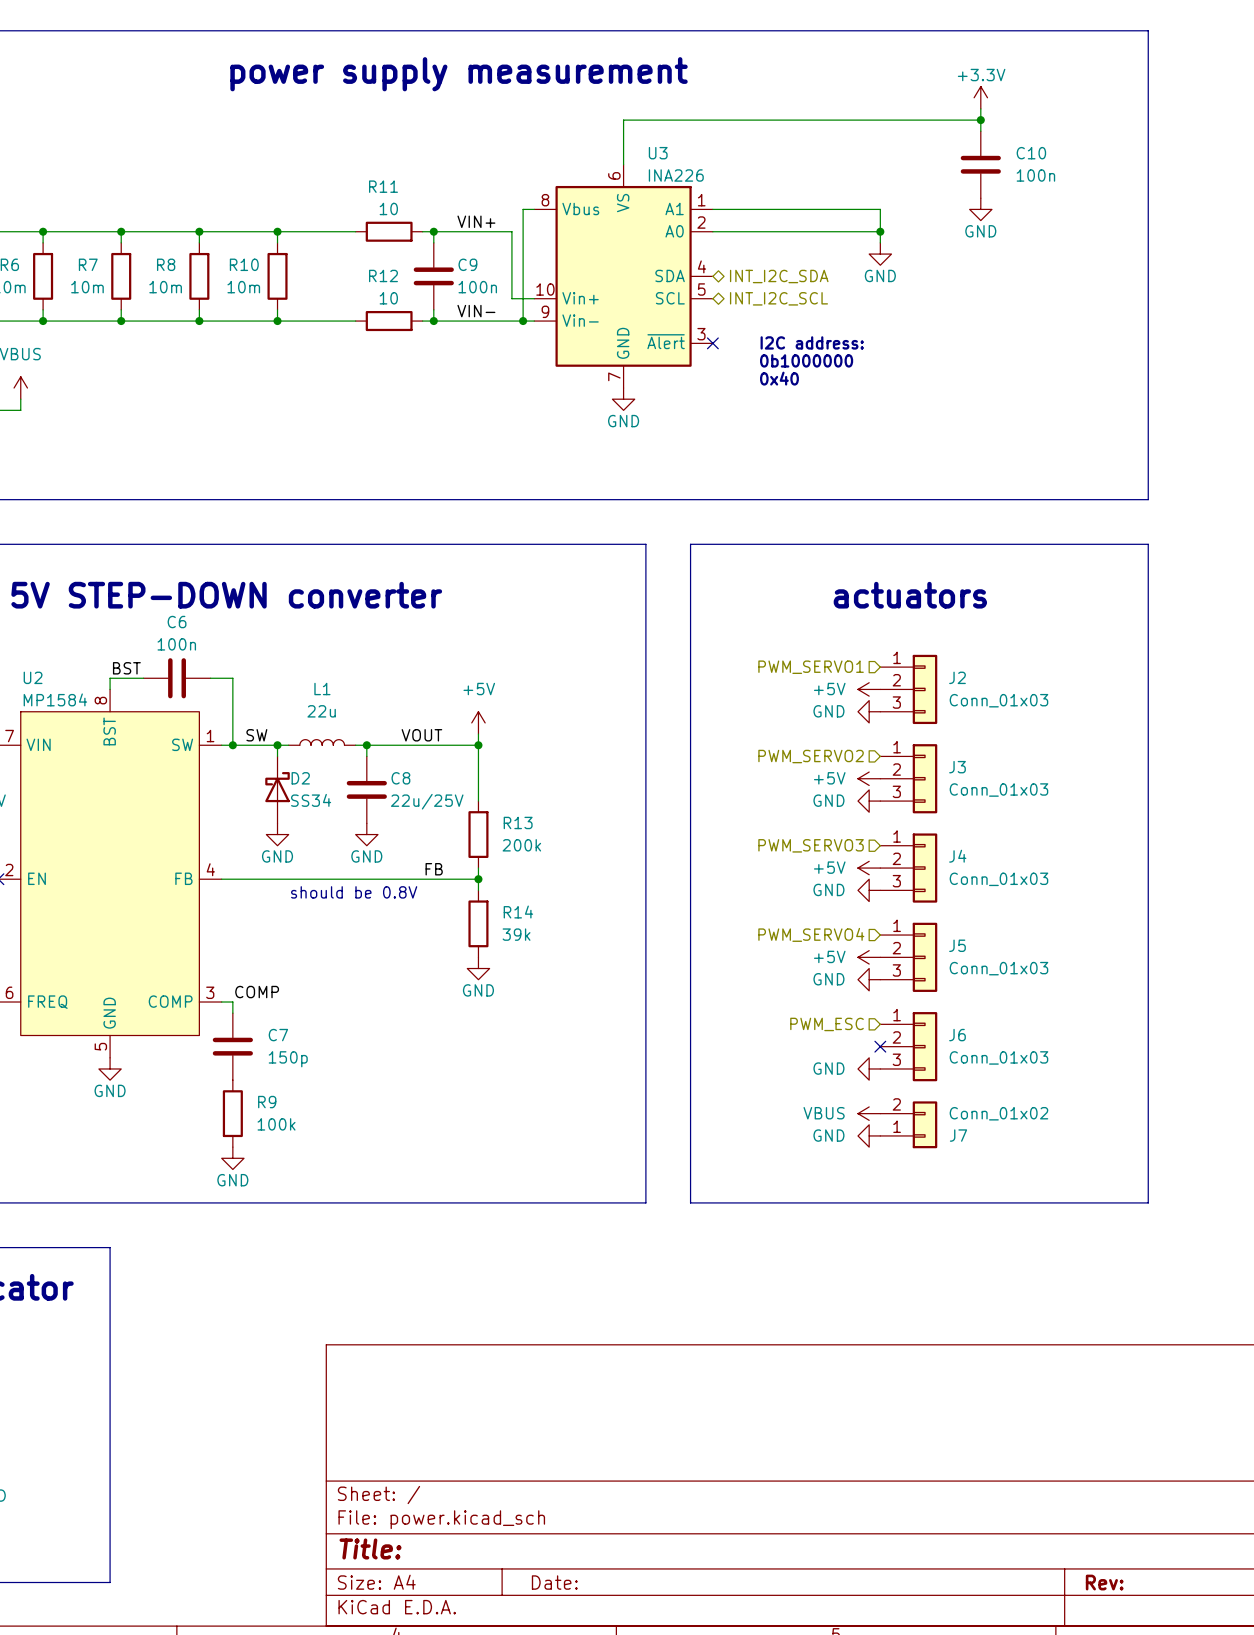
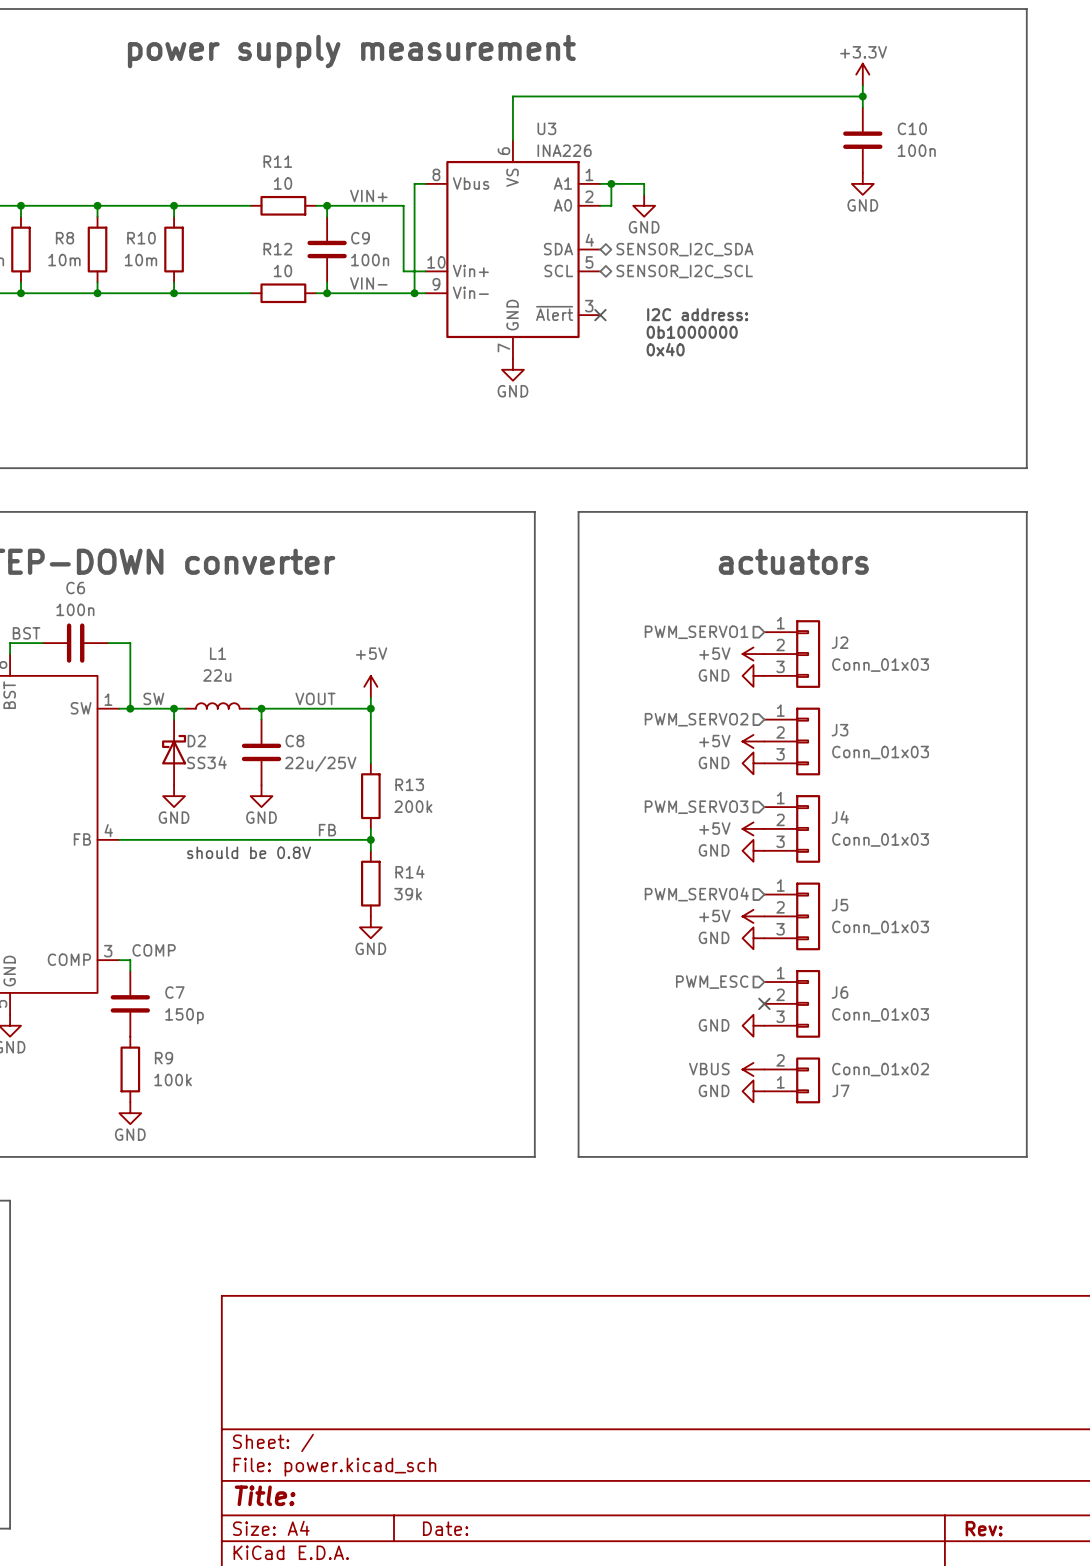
junction: none -> (611, 183)
wire: (757, 209) (880, 209) (880, 242) -> (644, 183) (644, 194)
wire: (724, 231) (880, 231) -> (611, 205) (611, 183)
junction: (880, 231) -> none
power symbol position: GND (880, 254) -> GND (644, 205)
hierarchical label: INT_I2C_SDA (779, 276) -> SENSOR_I2C_SDA (684, 249)
hierarchical label: INT_I2C_SCL (778, 298) -> SENSOR_I2C_SCL (684, 271)

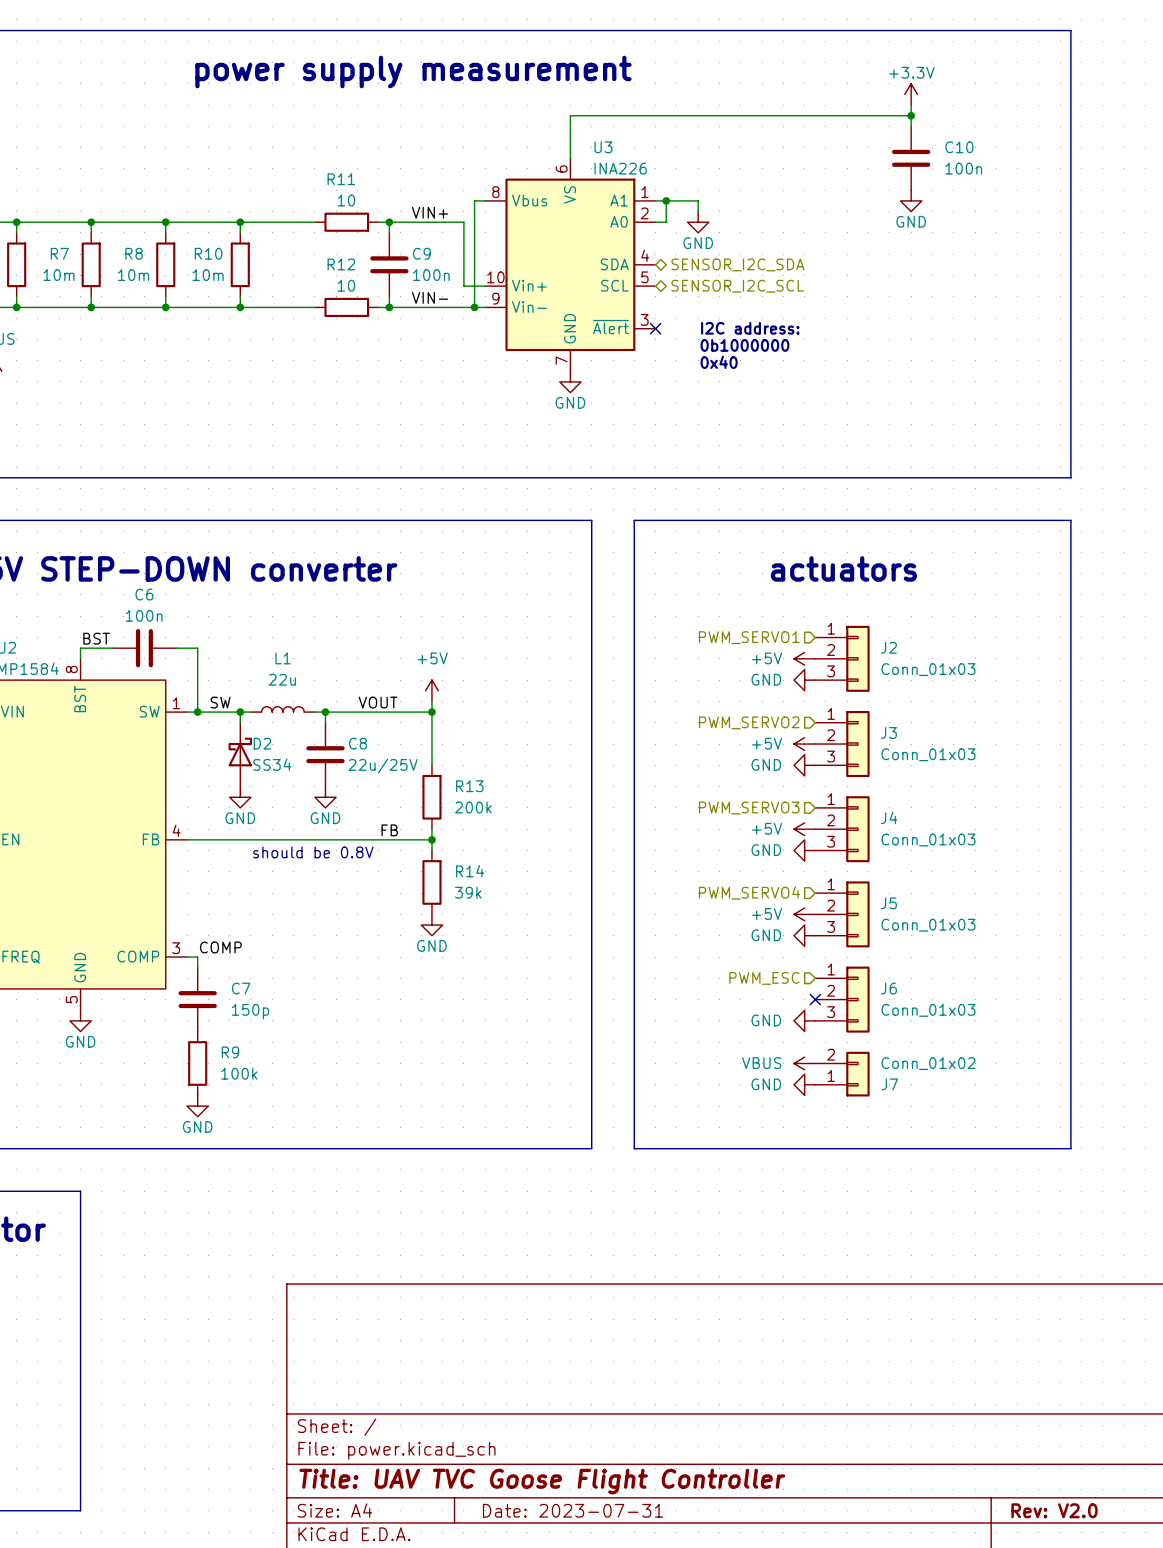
title block: Title: (265, 1495) -> Title: UAV TVC Goose Flight Controller (542, 1481)
title block: Date: (445, 1528) -> Date: 2023-07-31 (573, 1510)
title block: Rev: (984, 1528) -> Rev: V2.0 (1054, 1510)

